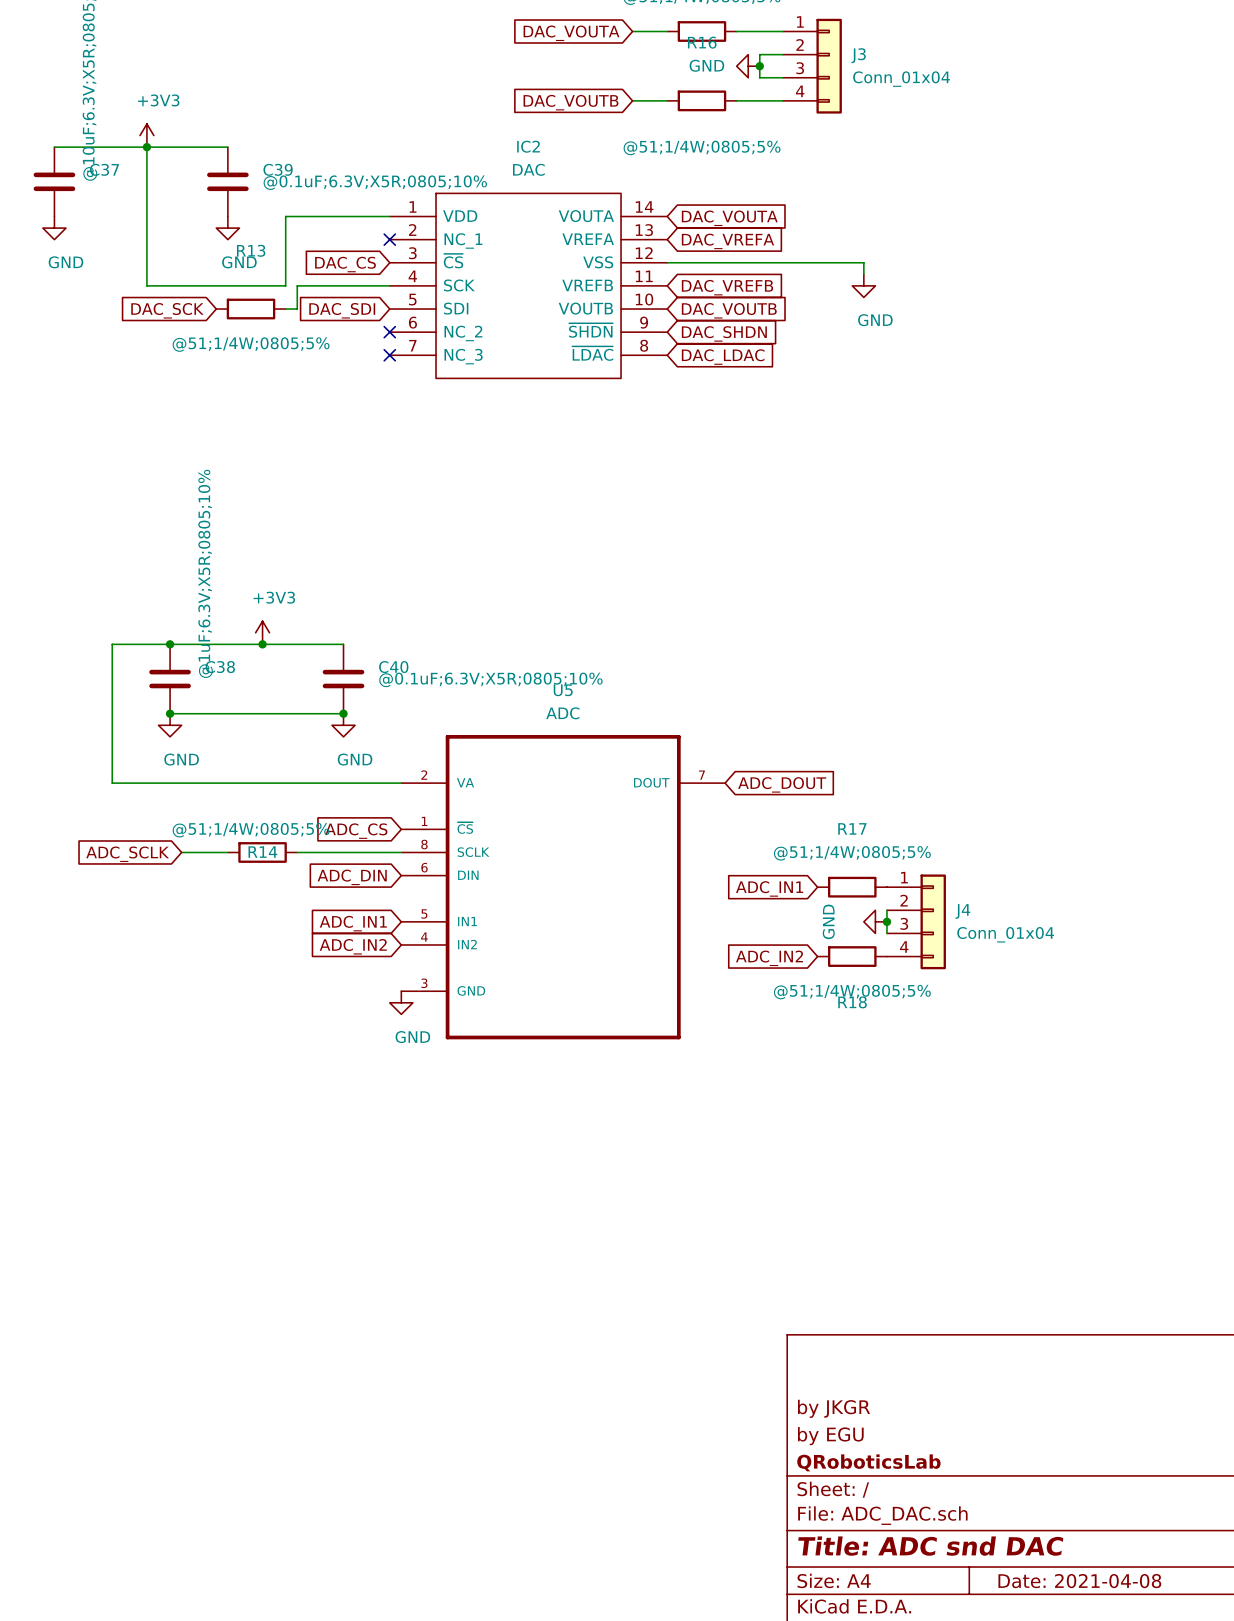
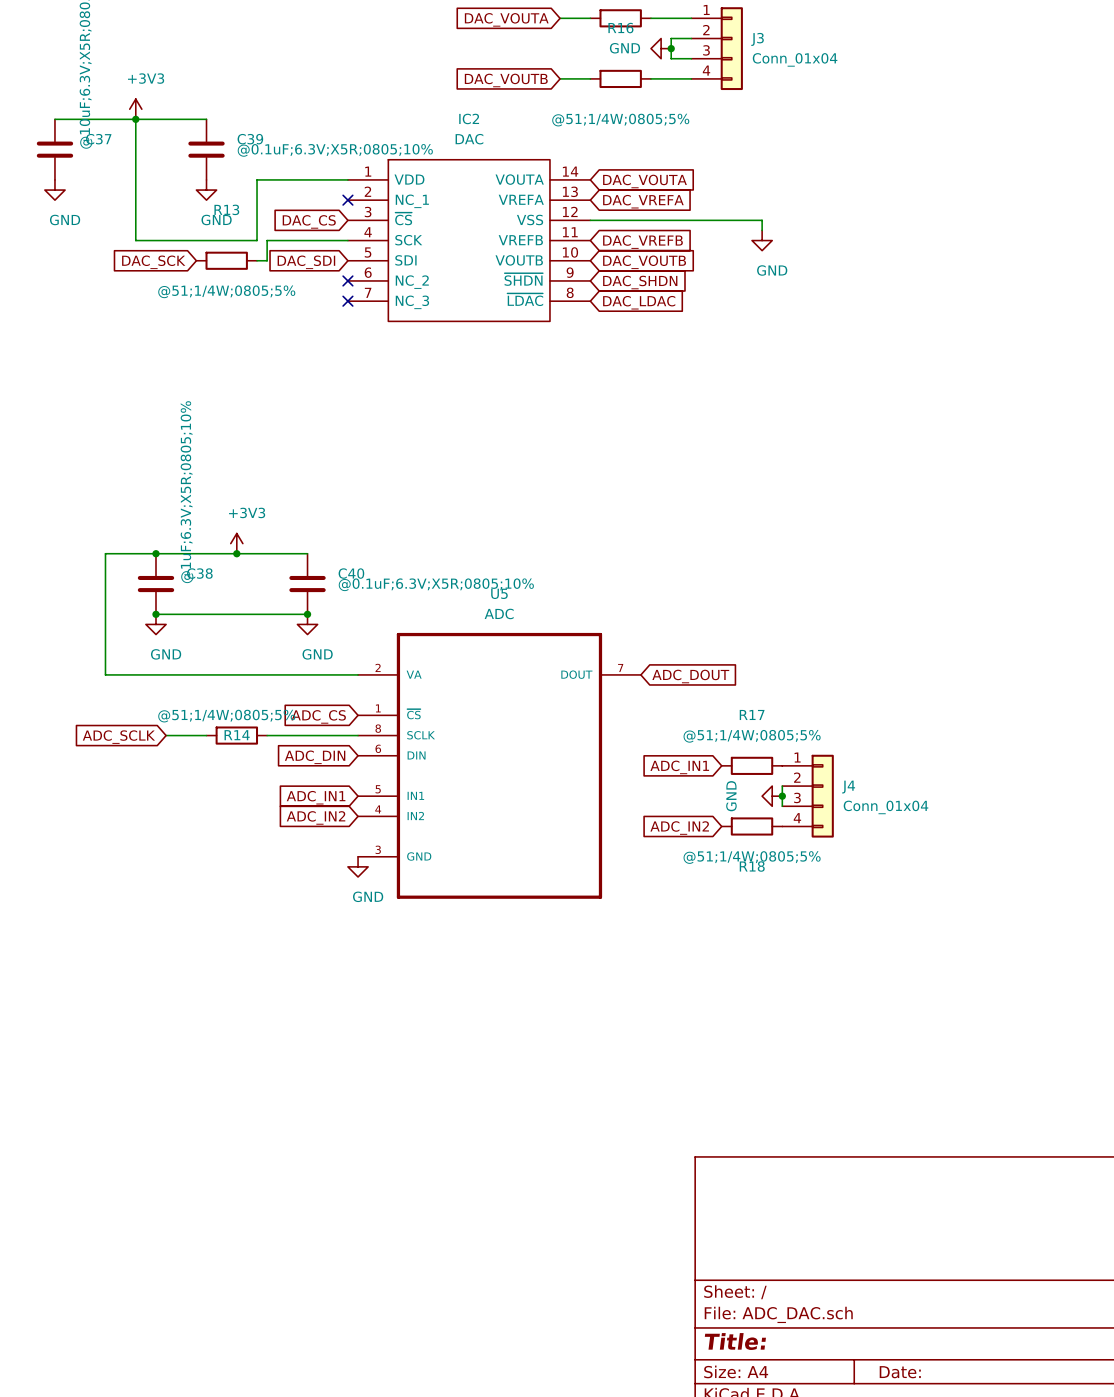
title block: by JKGR (834, 1408) -> none
title block: by EGU (830, 1436) -> none
title block: QRoboticsLab (868, 1462) -> none
title block: Title: ADC snd DAC (930, 1546) -> Title: (735, 1341)
title block: Date: 2021-04-08 (1079, 1581) -> Date: (900, 1372)

